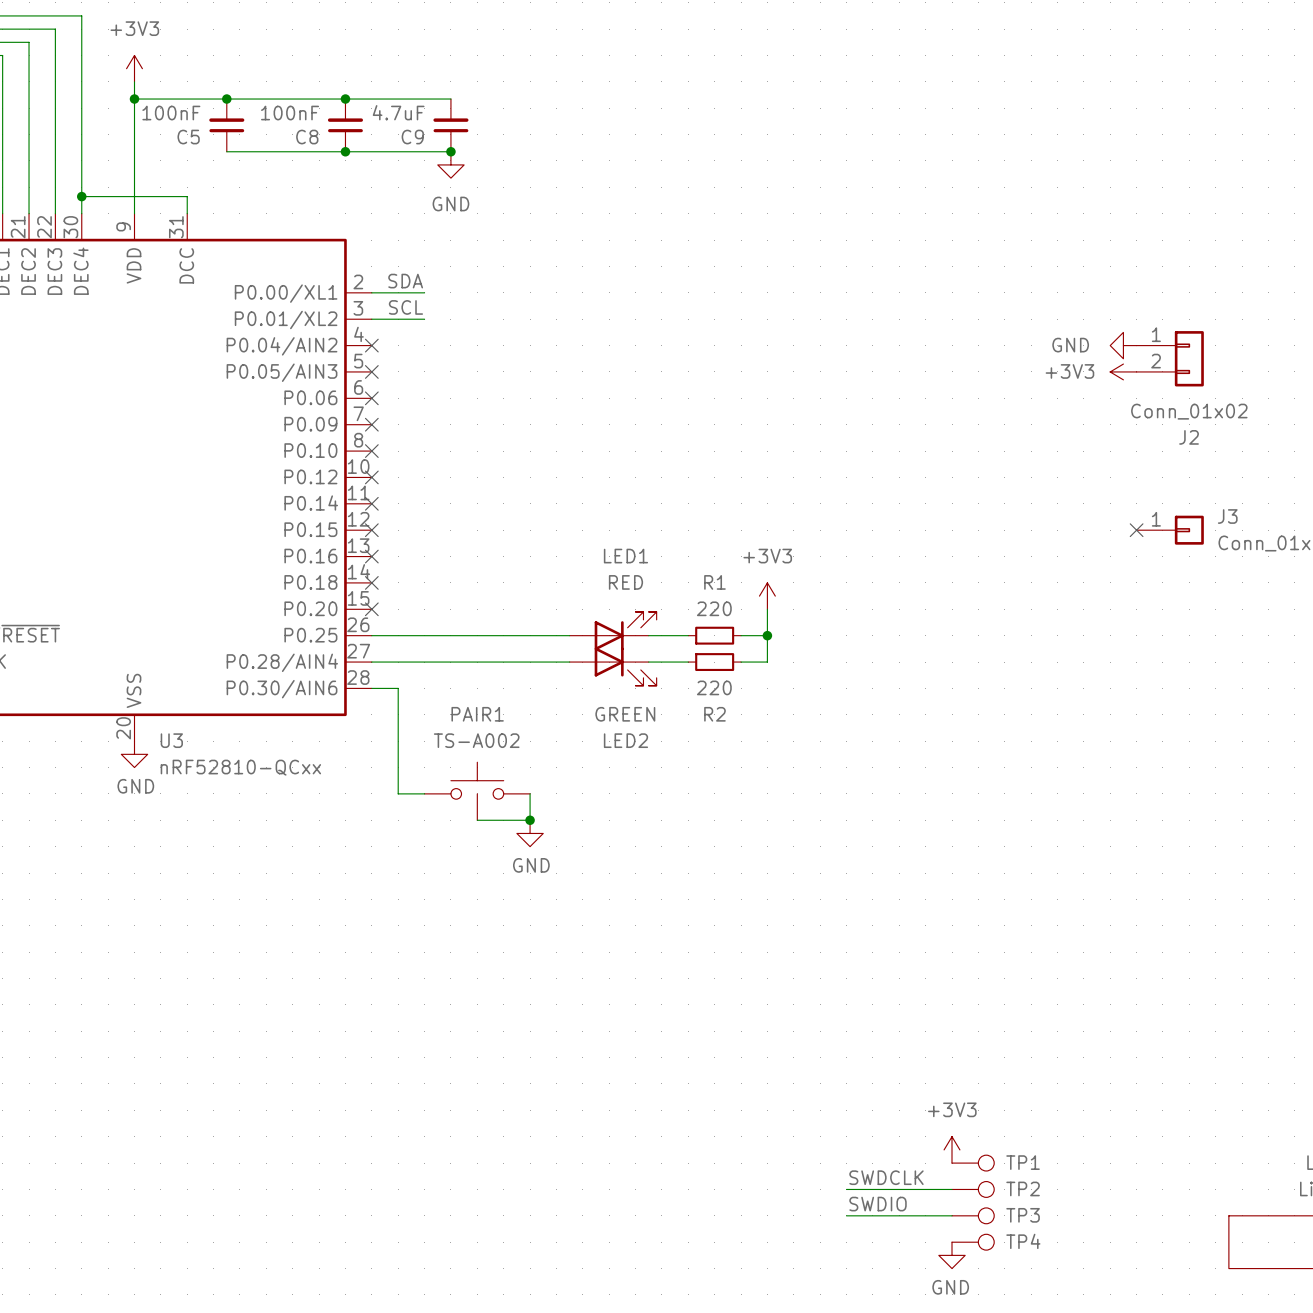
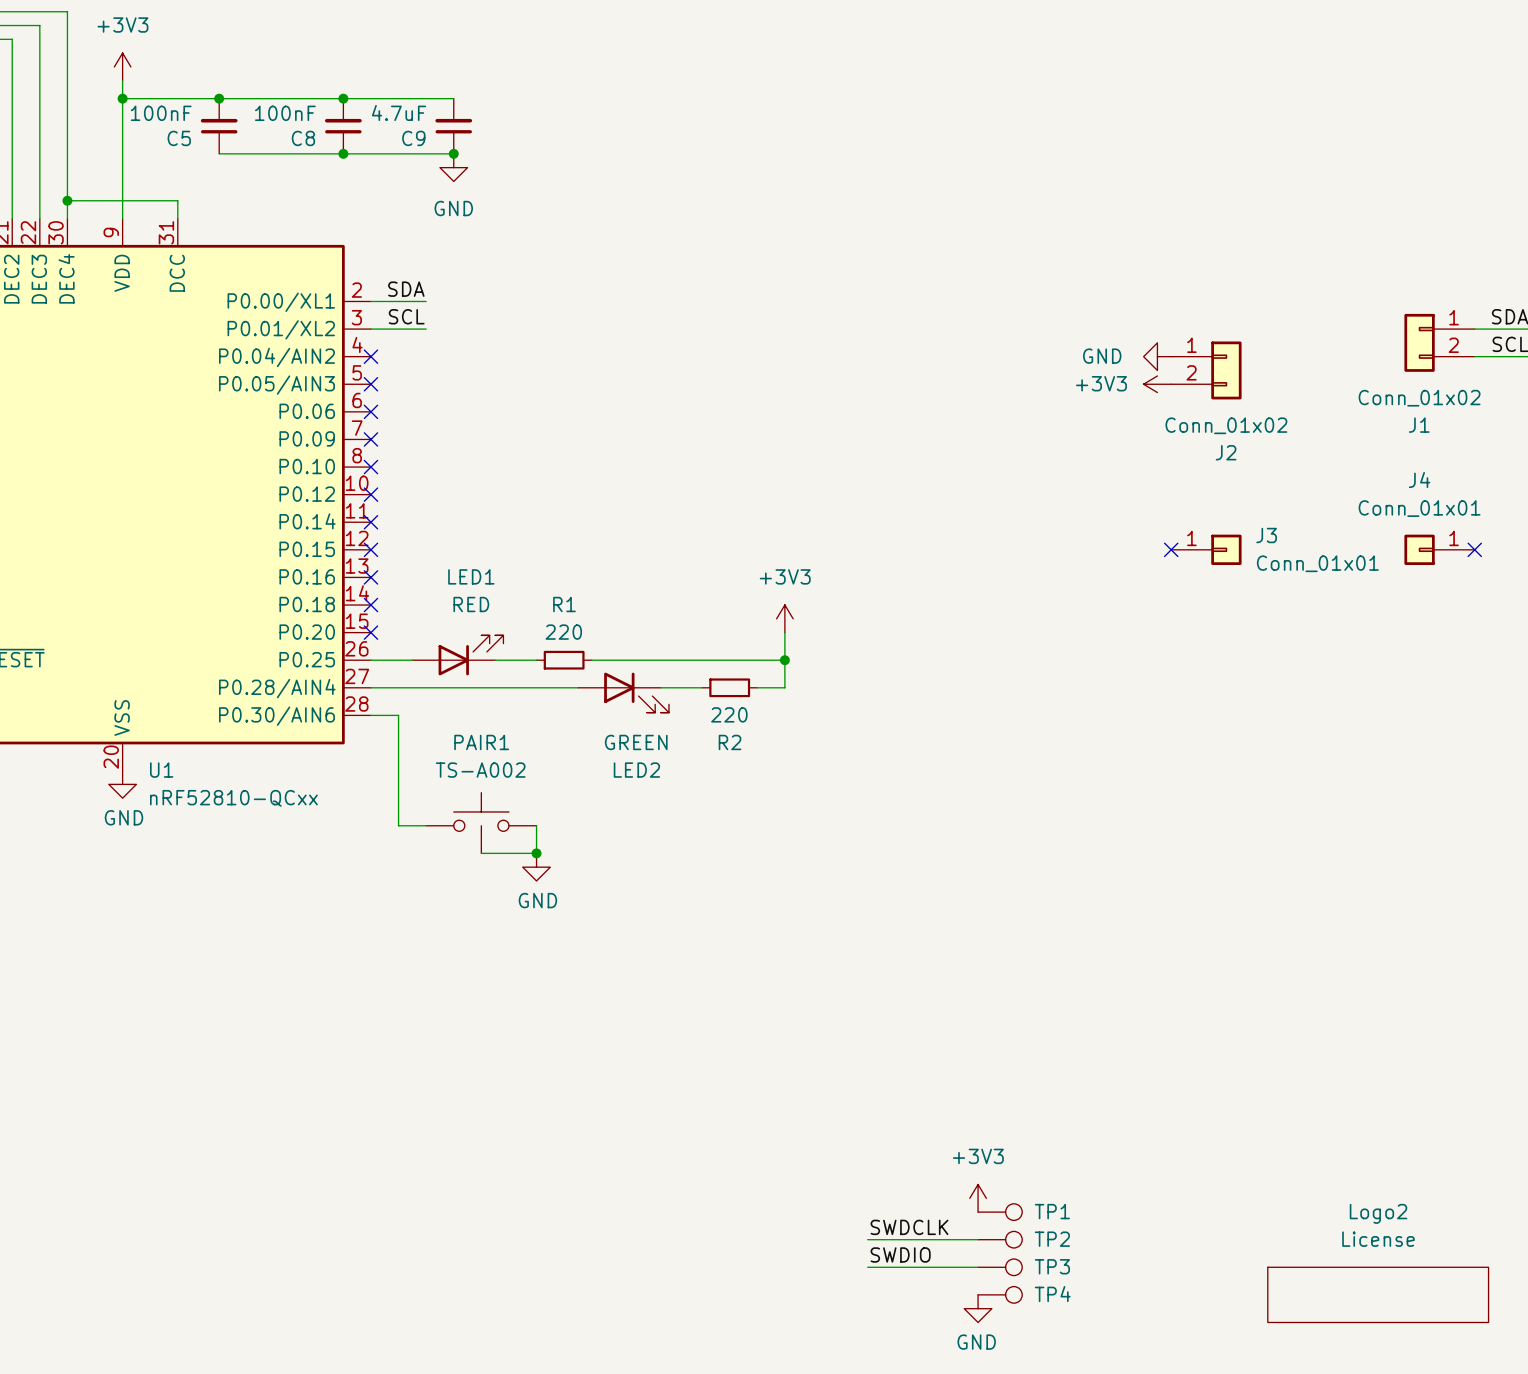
LED1 position: (613, 631) -> (457, 655)
wire: (530, 635) (569, 635) -> none
wire: none -> (702, 660) (757, 660)
R1 position: (714, 635) -> (564, 660)
U3 name: U3 (171, 740) -> U1 (161, 770)

